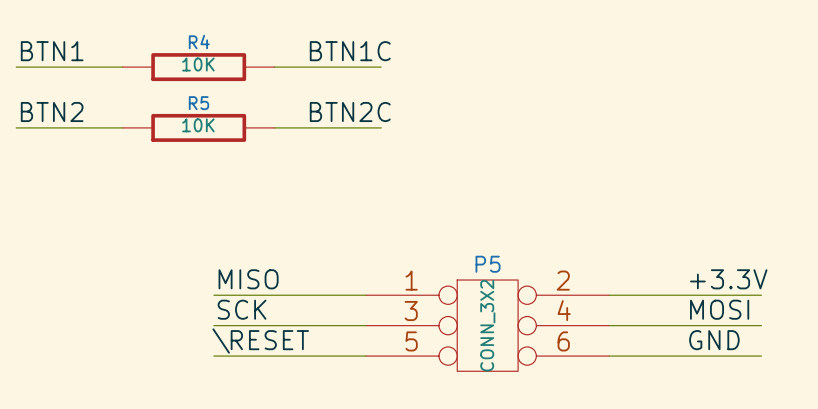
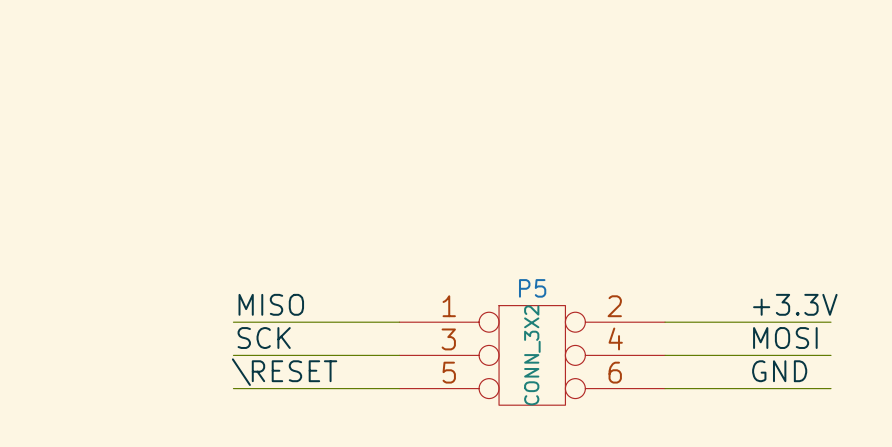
label: BTN1 (52, 51) -> none
label: BTN1C (350, 51) -> none
wire: (16, 67) (122, 67) -> none
R4: 10K (198, 67) -> none
wire: (274, 67) (381, 67) -> none
label: BTN2 (52, 112) -> none
label: BTN2C (350, 112) -> none
wire: (16, 127) (122, 127) -> none
R5: 10K (198, 127) -> none
wire: (274, 127) (381, 127) -> none

